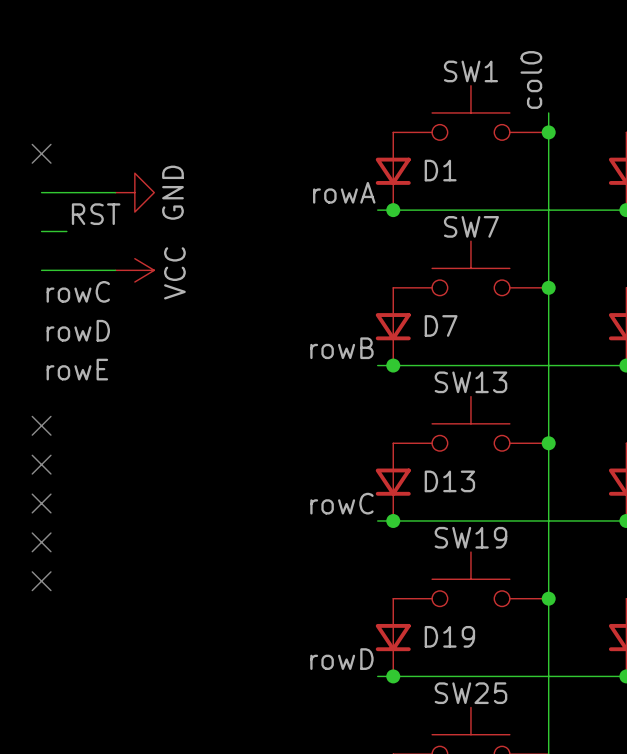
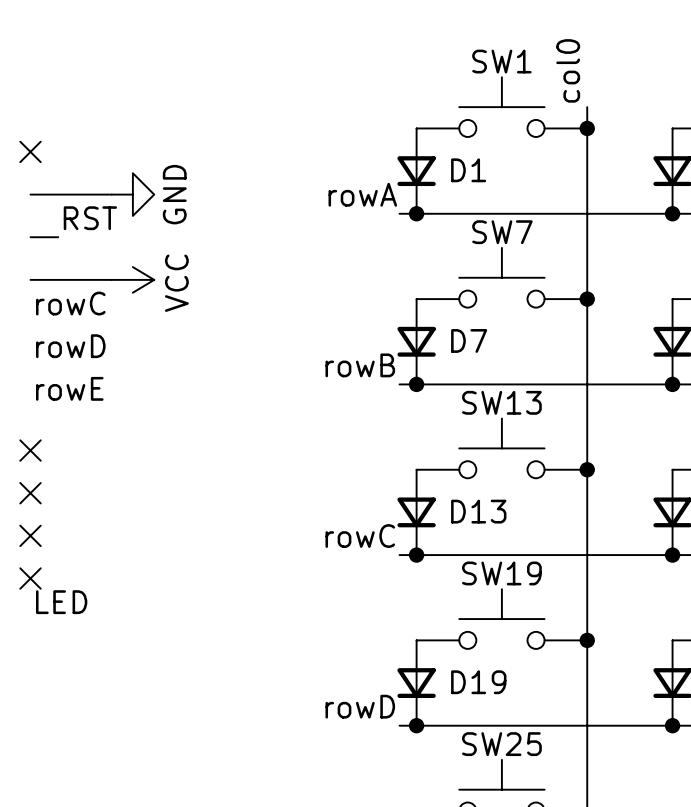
label: none -> LED (61, 602)
no-connect mark: (41, 581) -> none

